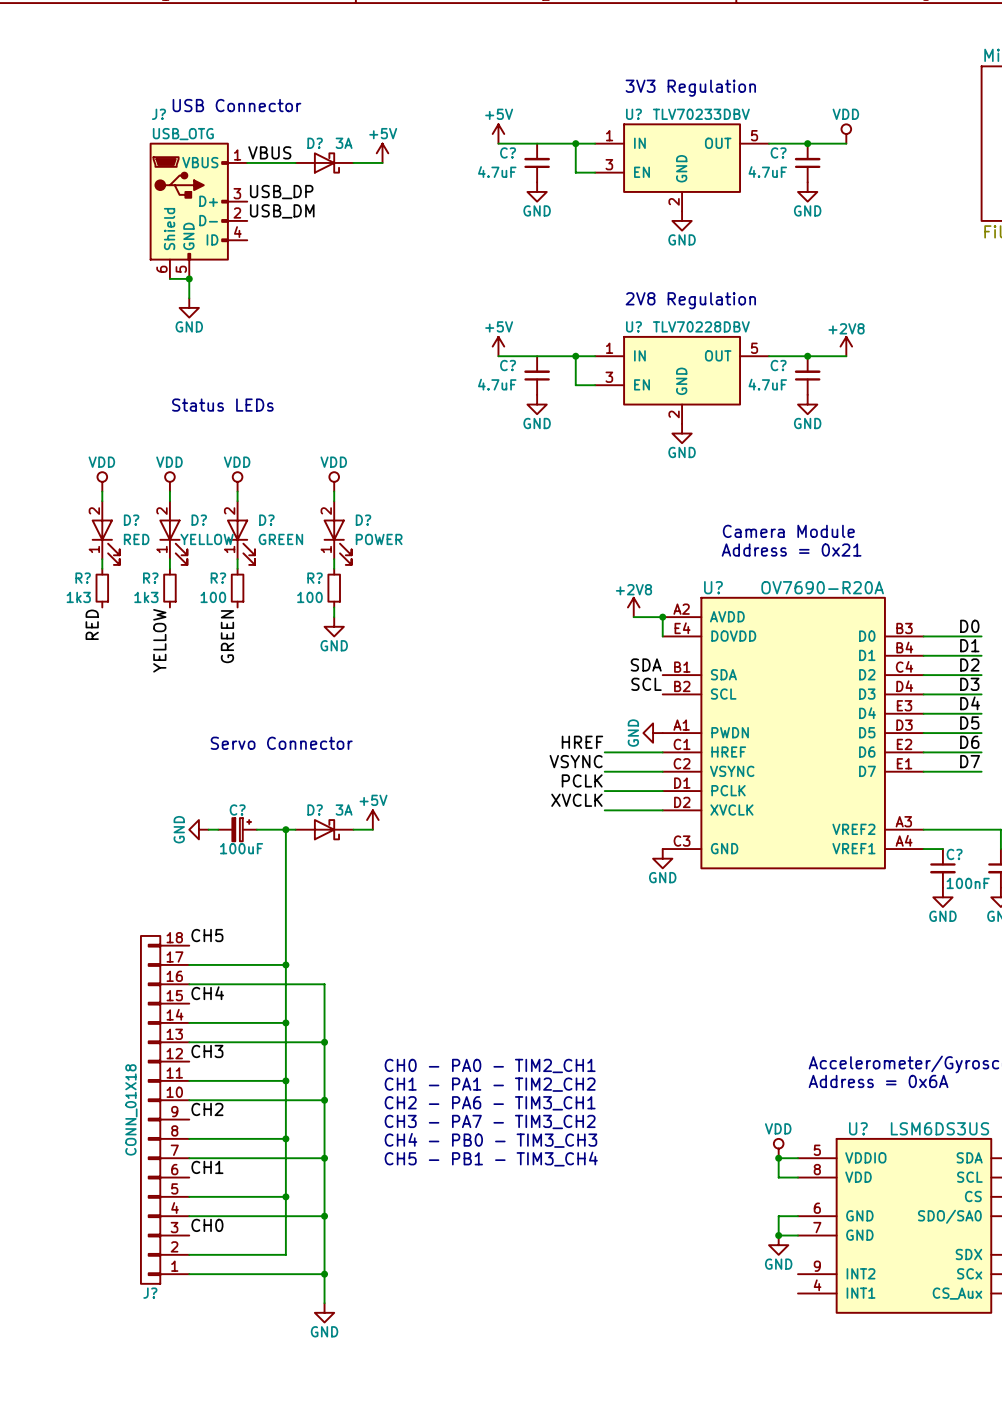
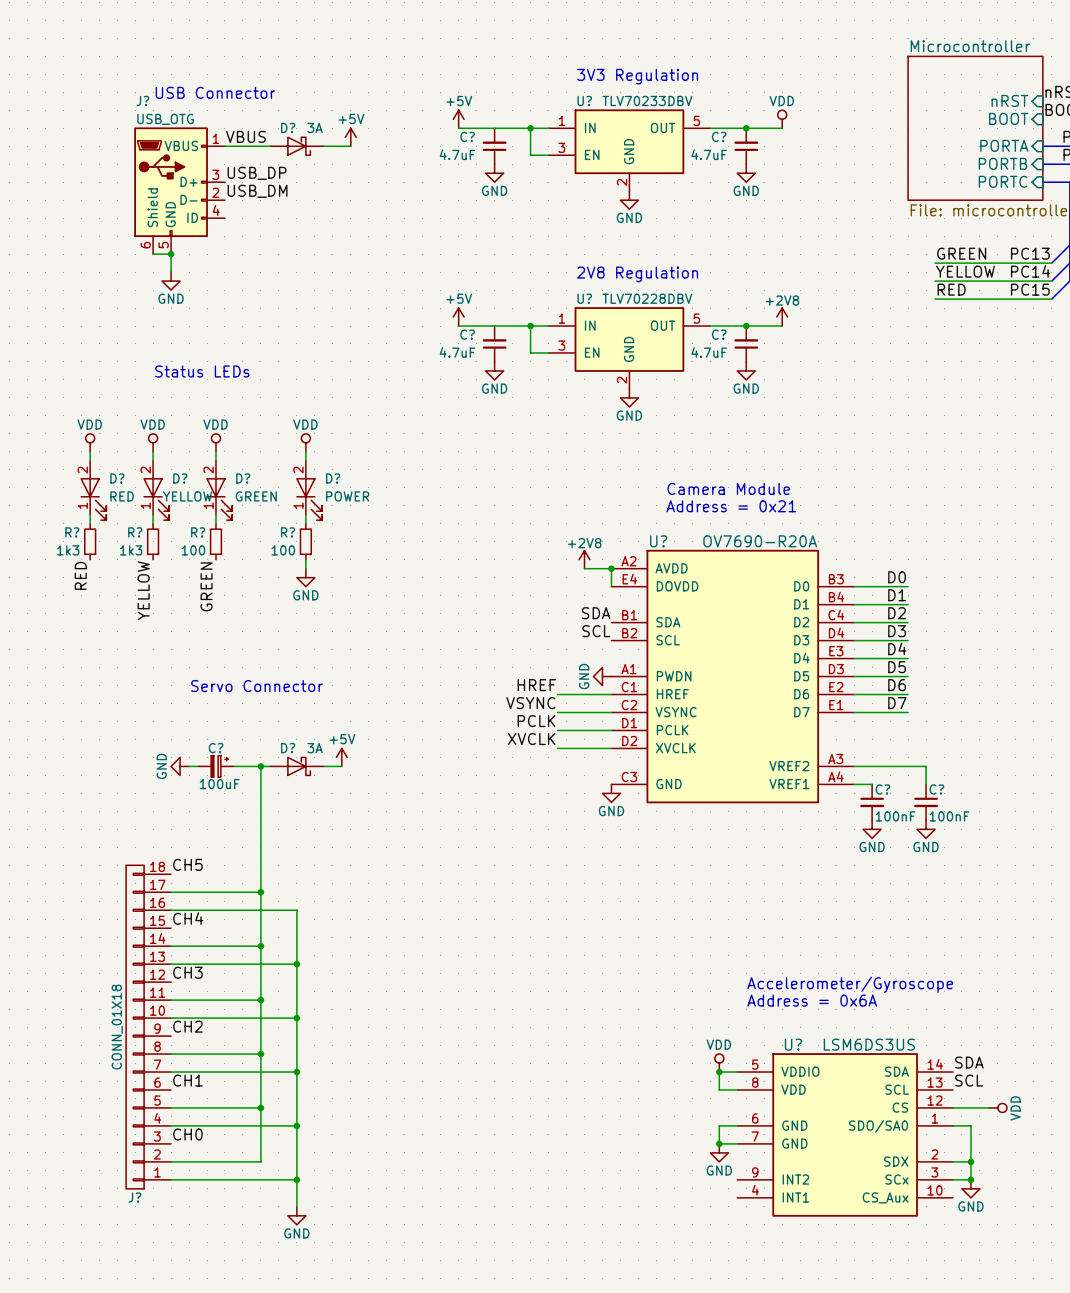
text: CH0 - PA0 - TIM2_CH1 (490, 1065) -> none
text: CH1 - PA1 - TIM2_CH2 (490, 1084) -> none
text: CH2 - PA6 - TIM3_CH1 (490, 1103) -> none
text: CH3 - PA7 - TIM3_CH2 (490, 1121) -> none
text: CH4 - PB0 - TIM3_CH3 (490, 1140) -> none
text: CH5 - PB1 - TIM3_CH4 (491, 1159) -> none

